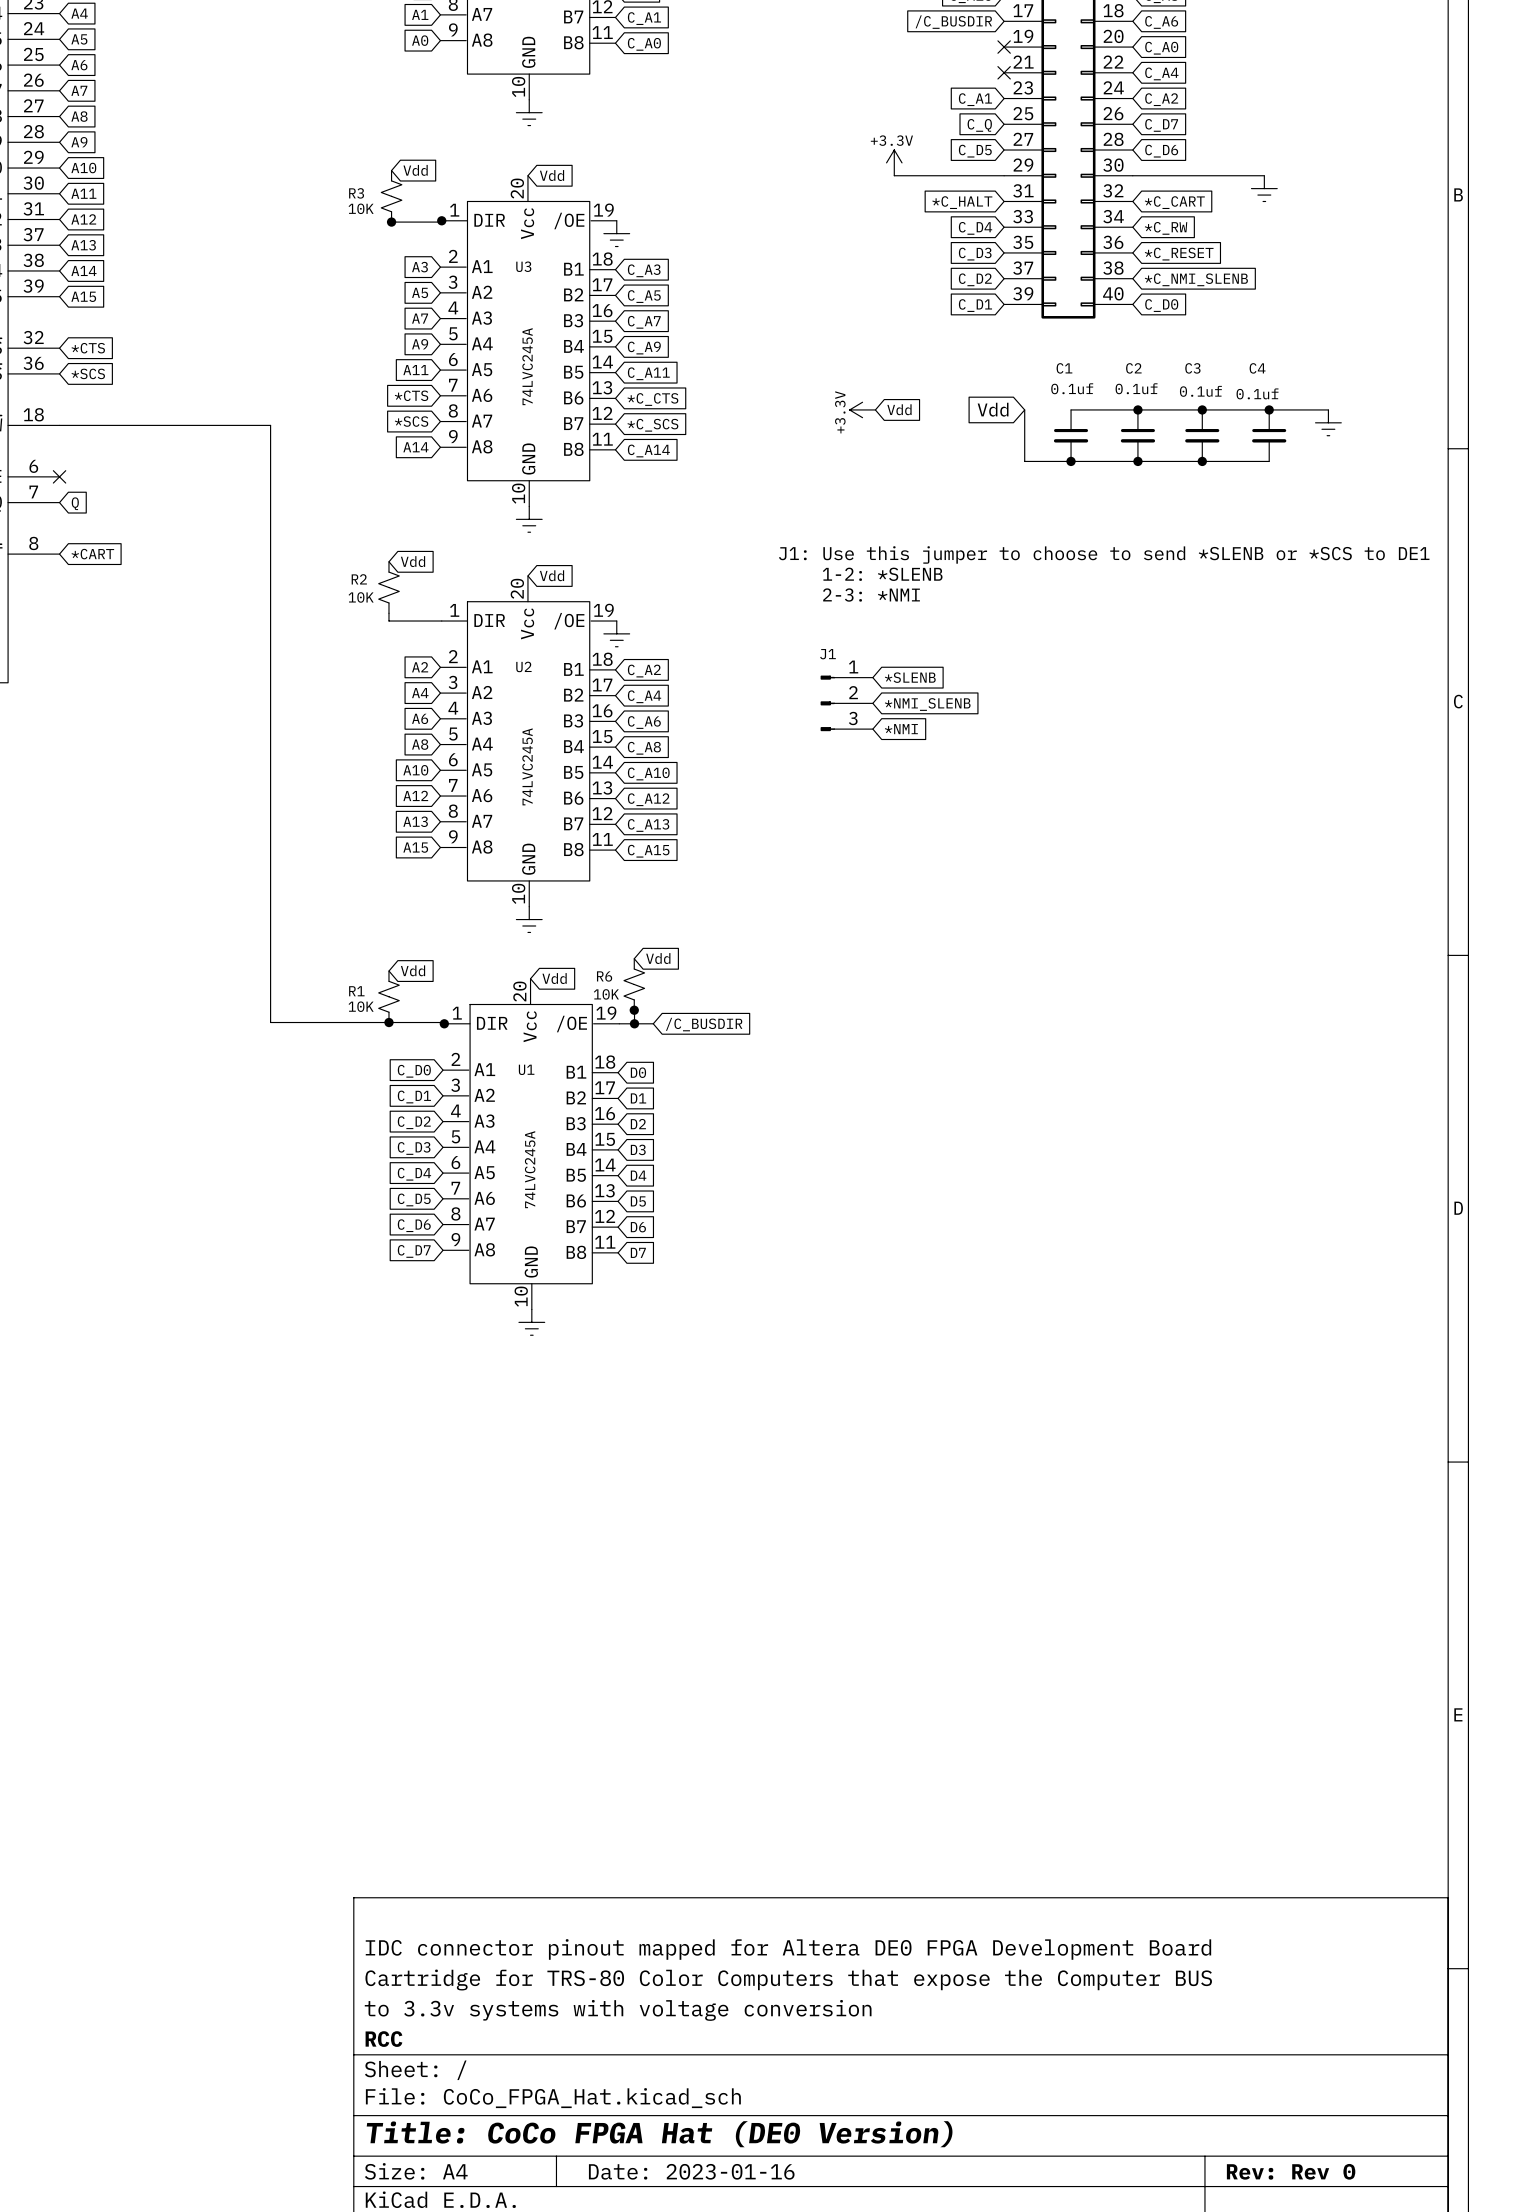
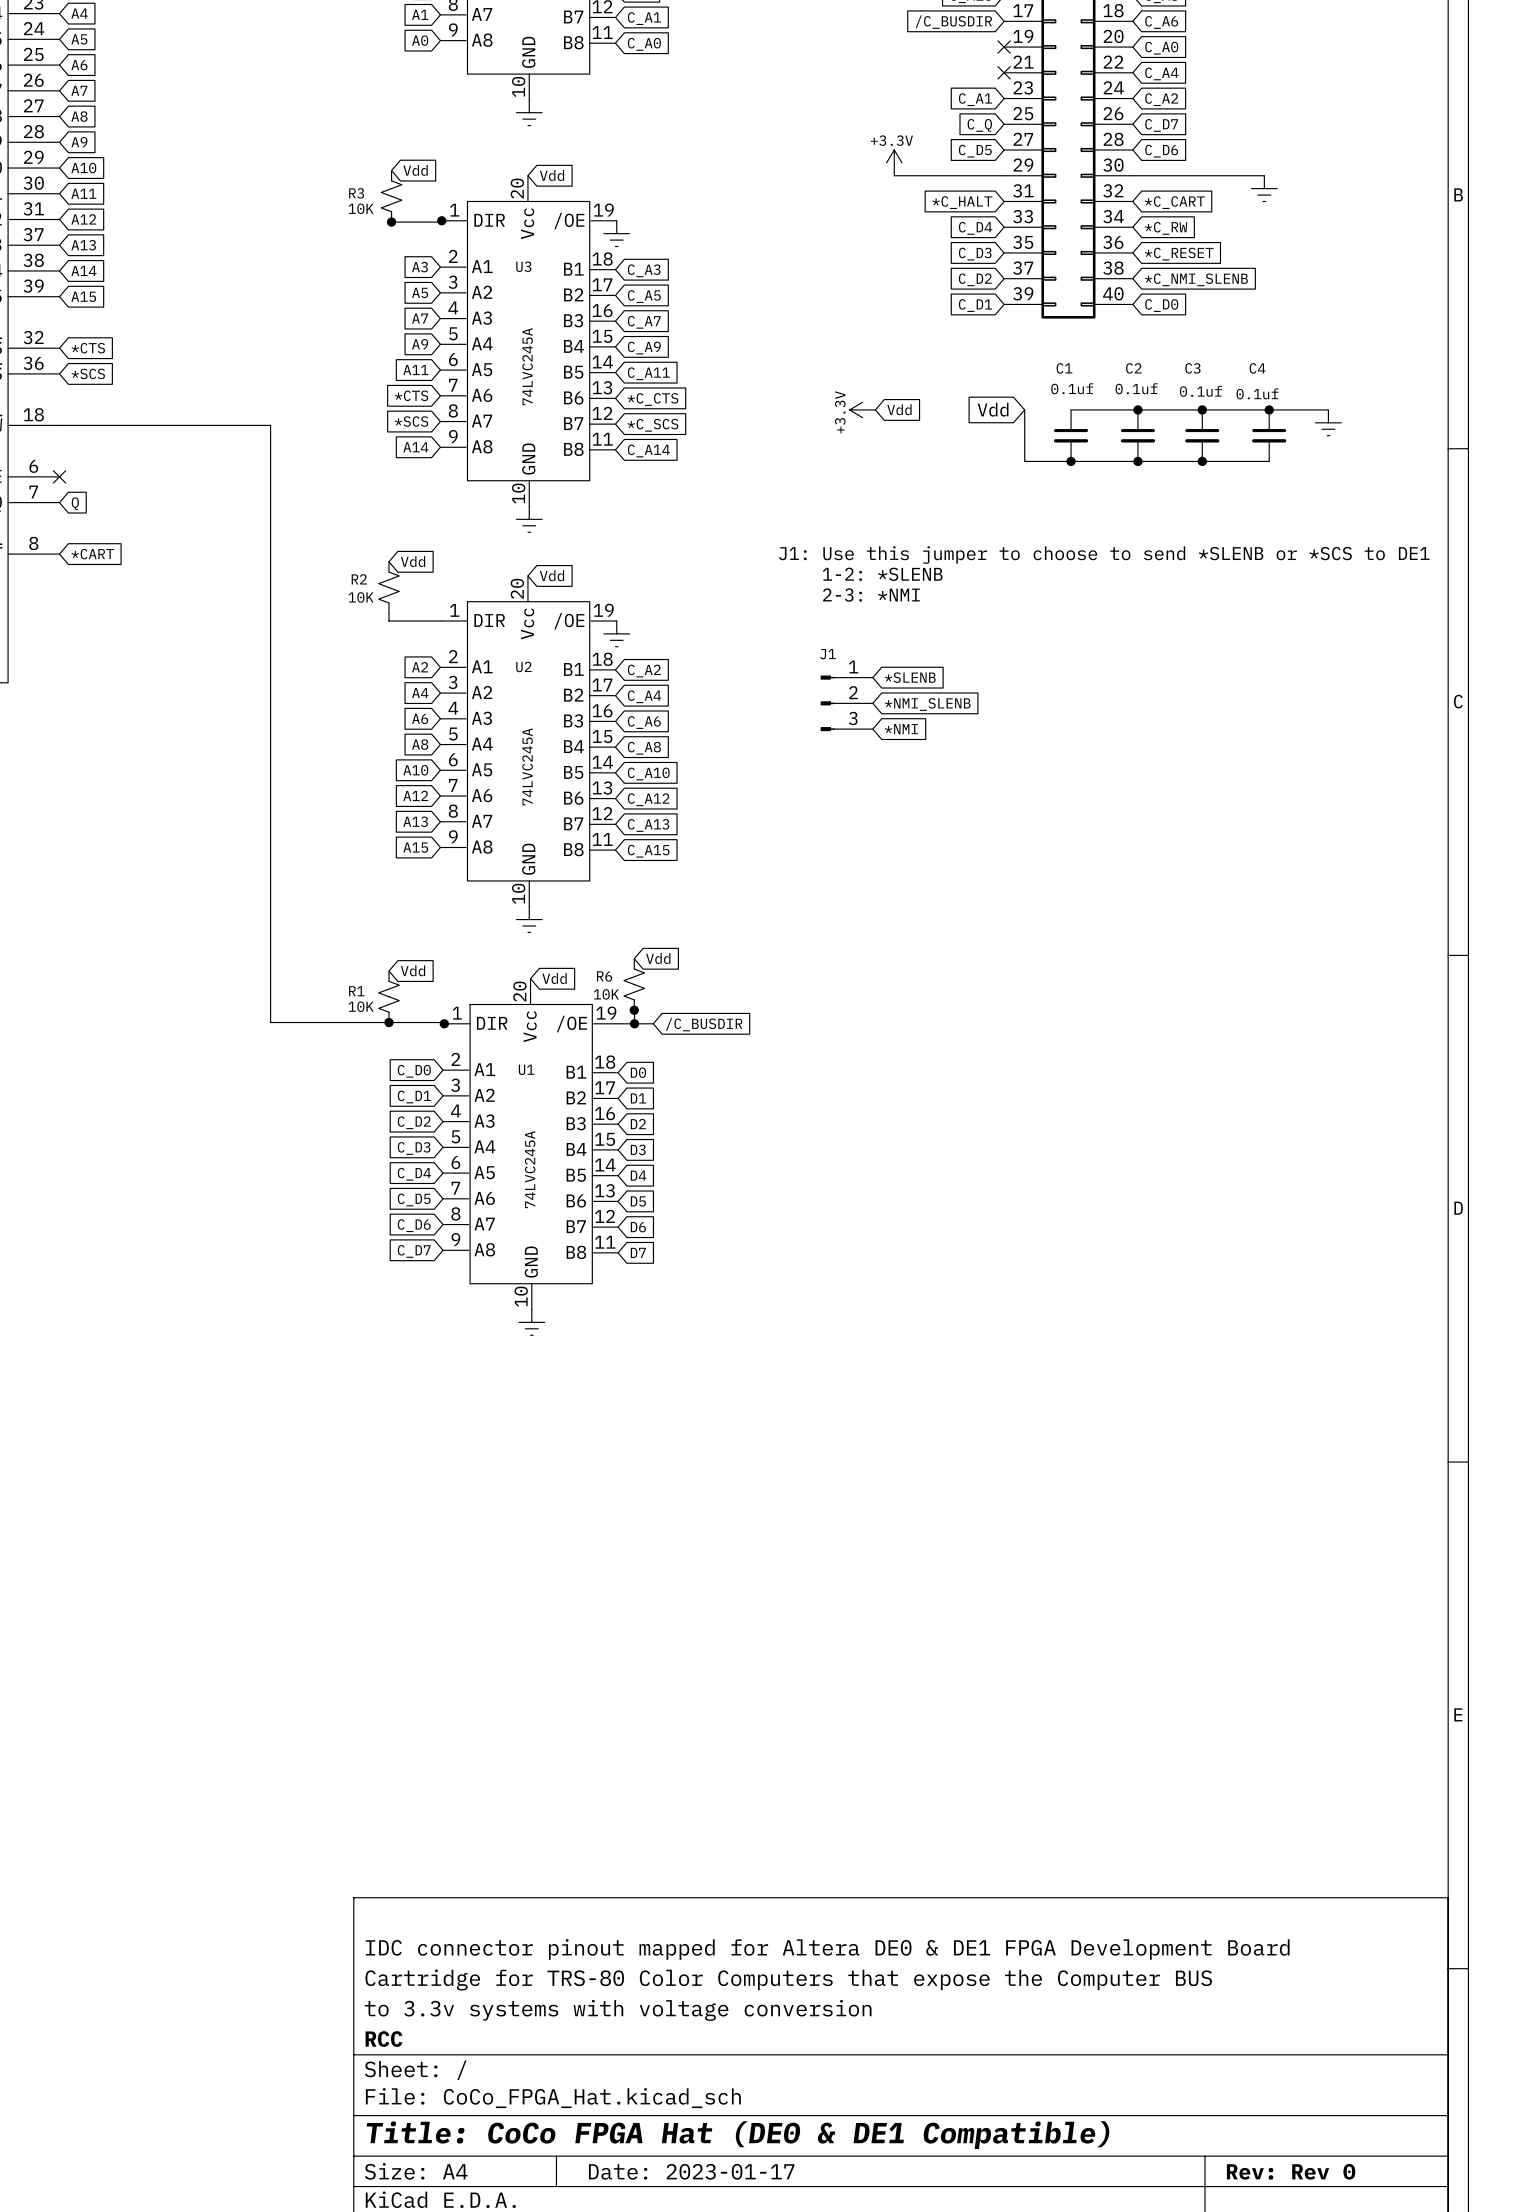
title block: IDC connector pinout mapped for Altera DE0 FPGA Development Board (788, 1949) -> IDC connector pinout mapped for Altera DE0 & DE1 FPGA Development Board (827, 1949)
title block: Title: CoCo FPGA Hat (DE0 Version) (659, 2134) -> Title: CoCo FPGA Hat (DE0 & DE1 Compatible) (738, 2135)
title block: Date: 2023-01-16 (691, 2171) -> Date: 2023-01-17 (691, 2171)

